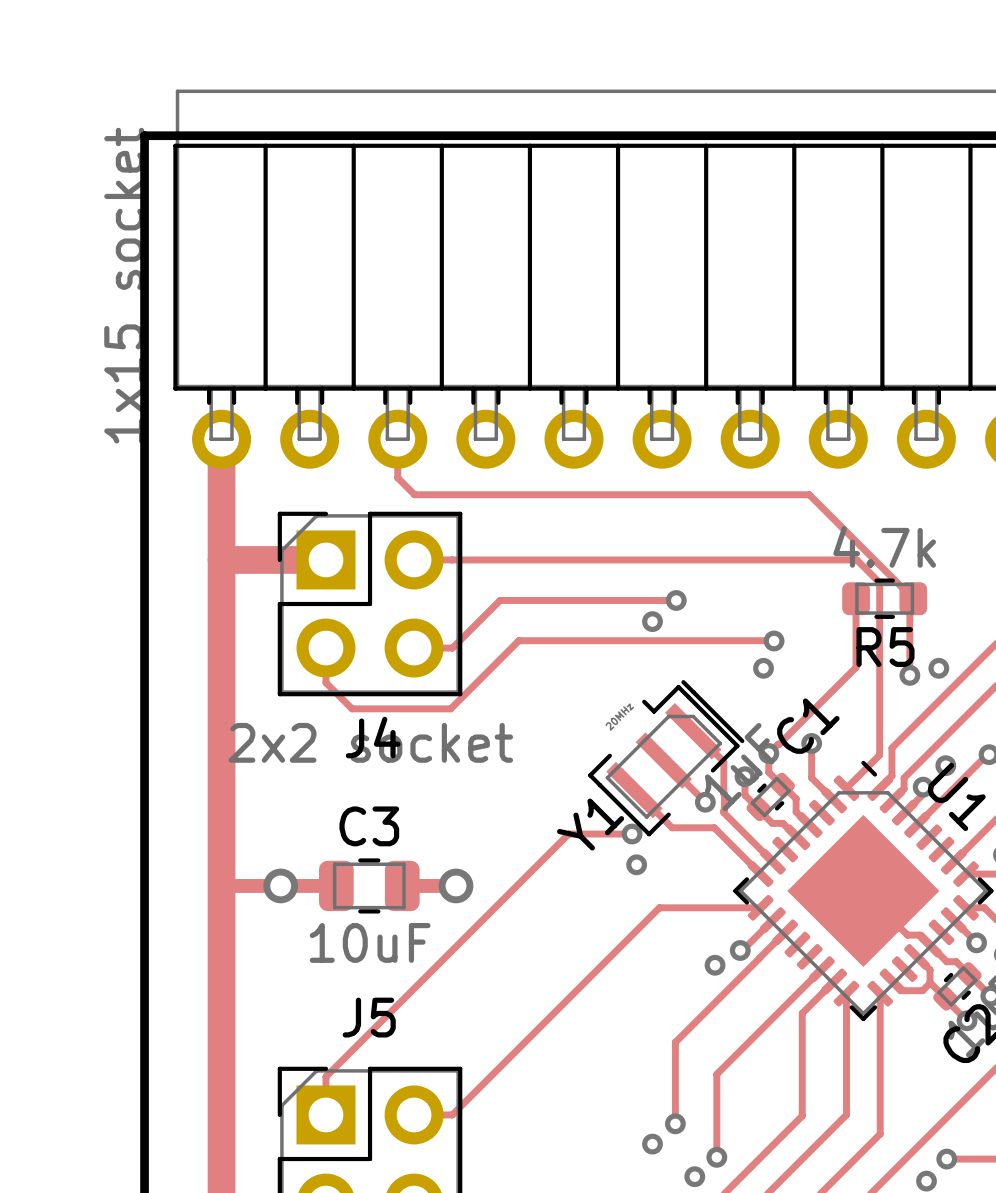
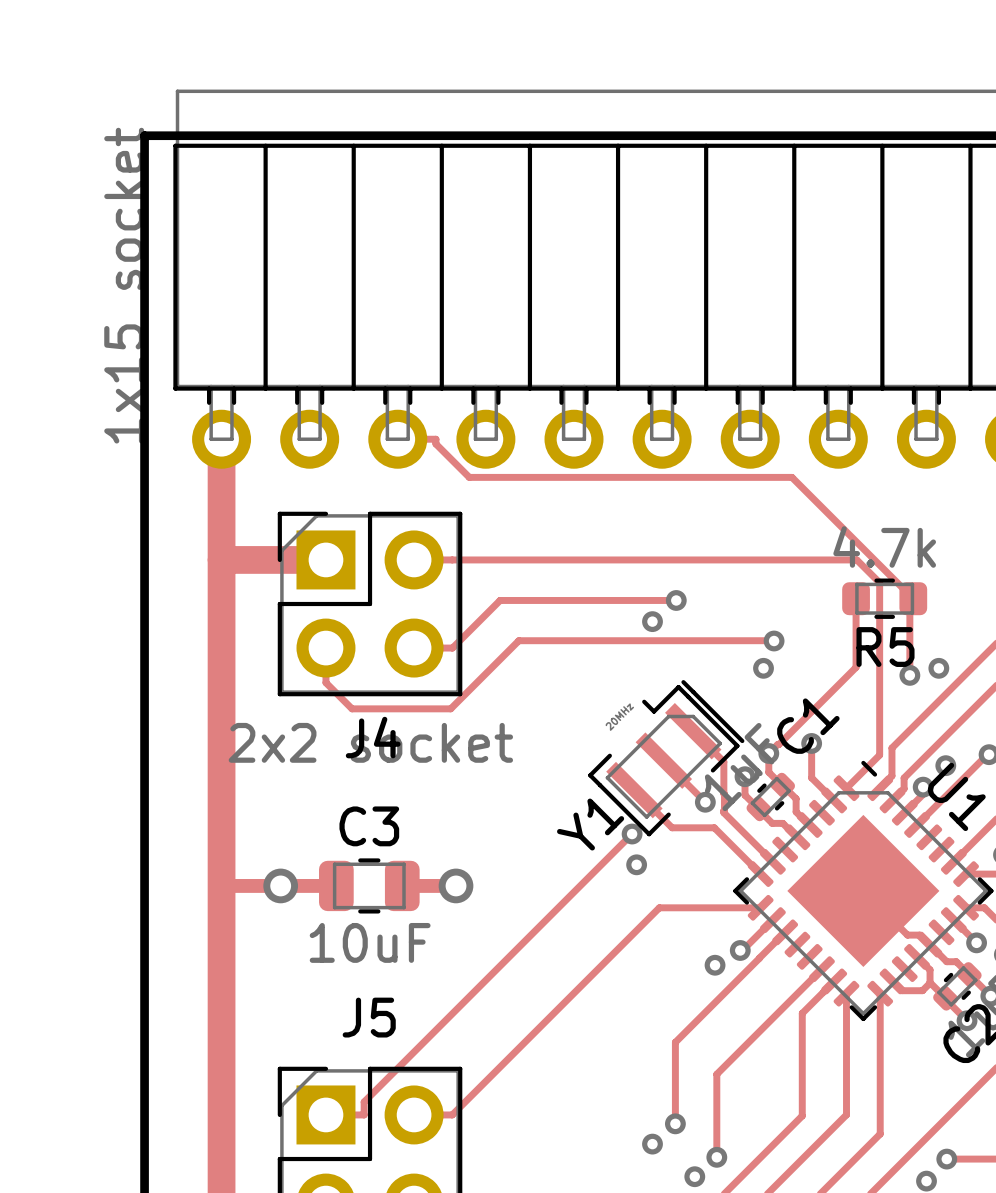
track: (397, 439) (397, 477) (414, 494) (809, 494) -> (397, 439) (435, 439) (435, 444) (469, 477) (791, 477) (809, 494)
track: (632, 834) (568, 834) (325, 1076) (325, 1114) -> (632, 834) (364, 1101) (364, 1114) (325, 1114)

